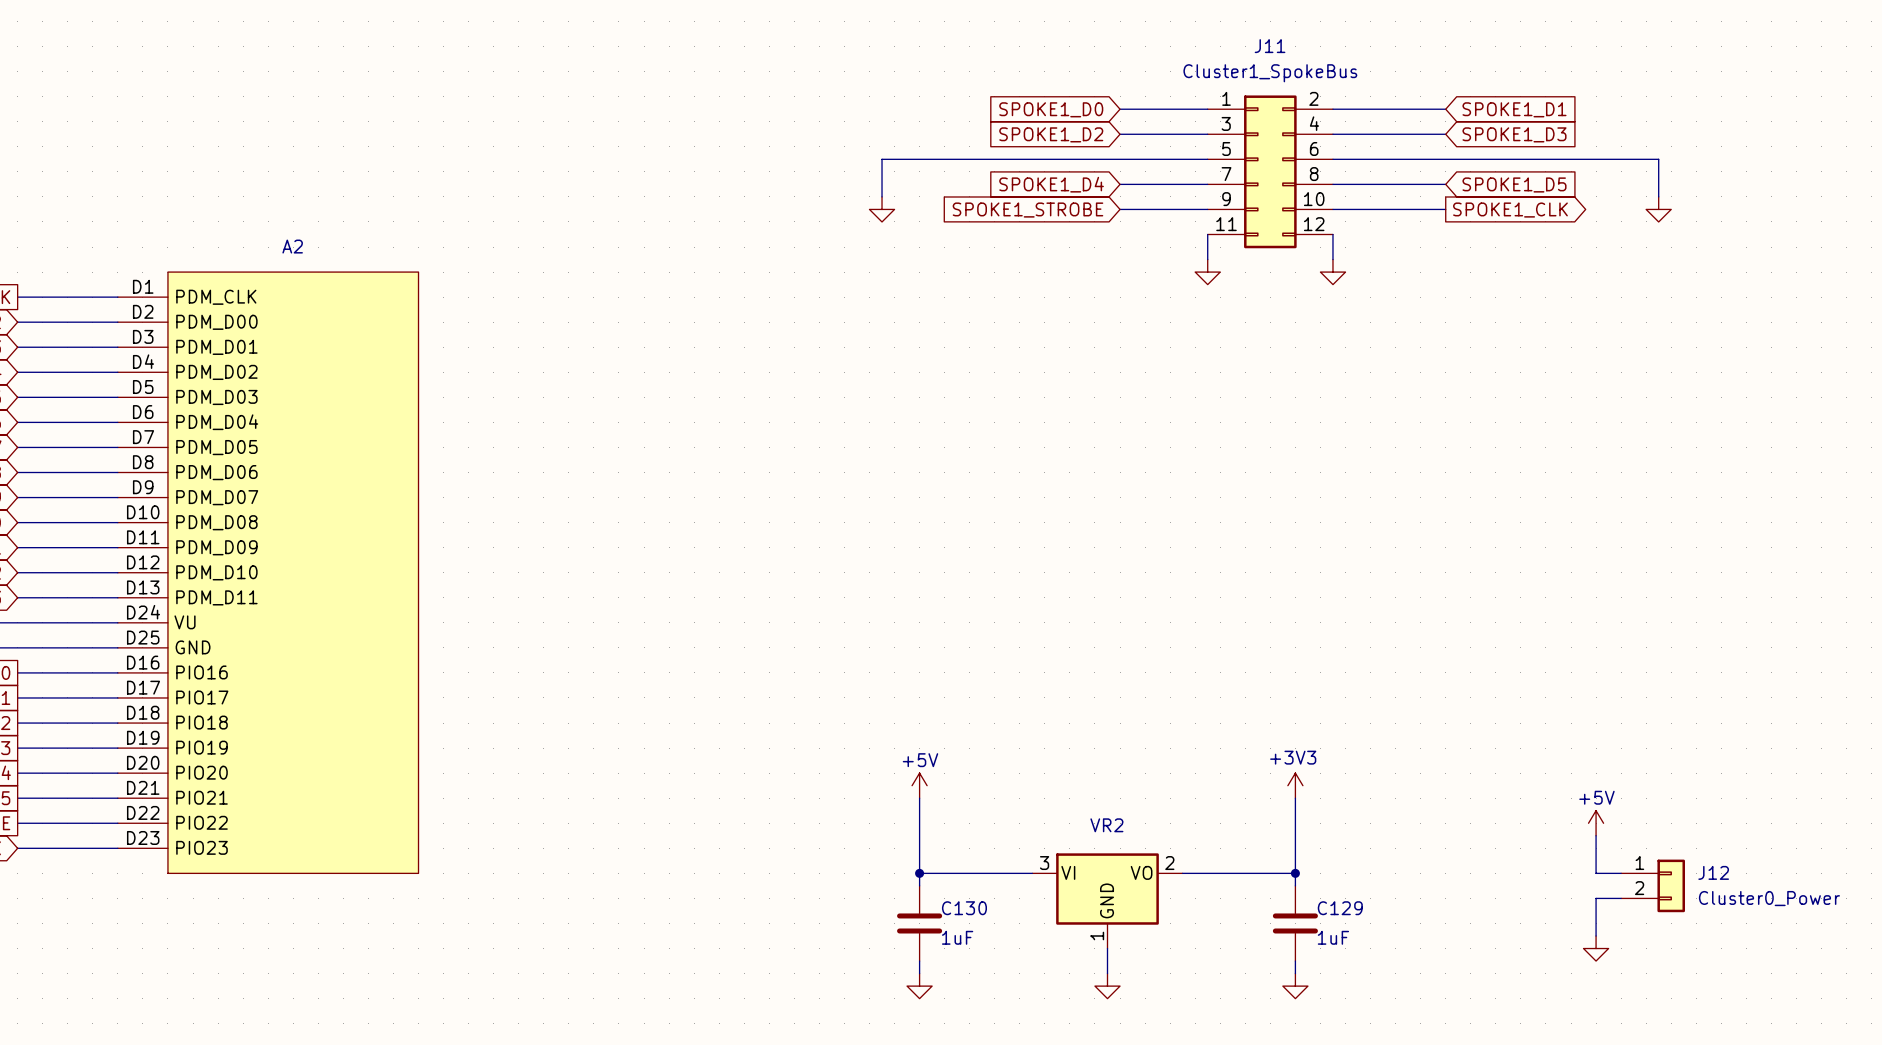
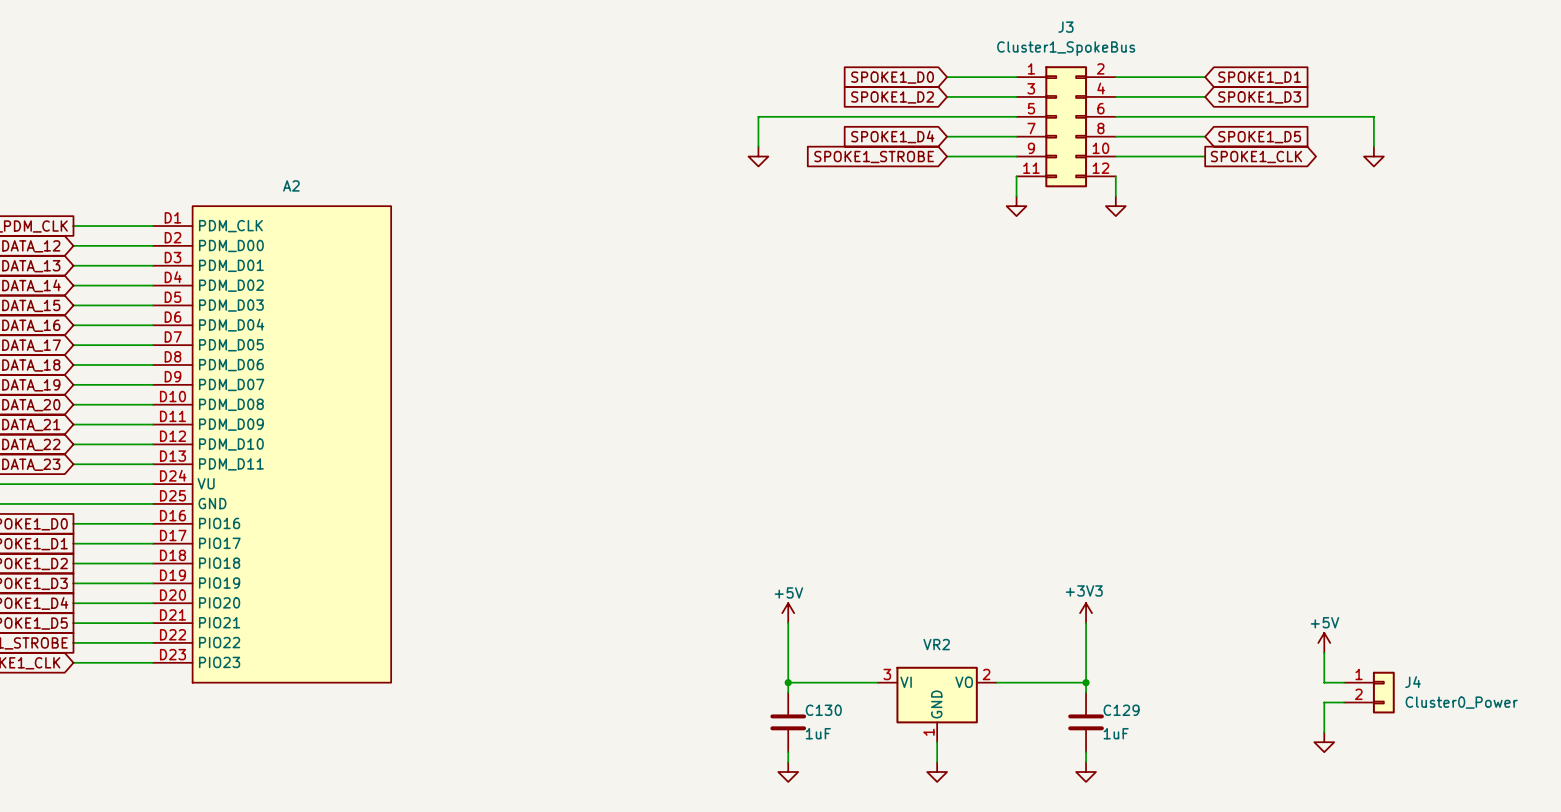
J11 name: J11 (1270, 46) -> J3 (1065, 27)
J12 name: J12 (1713, 872) -> J4 (1412, 682)

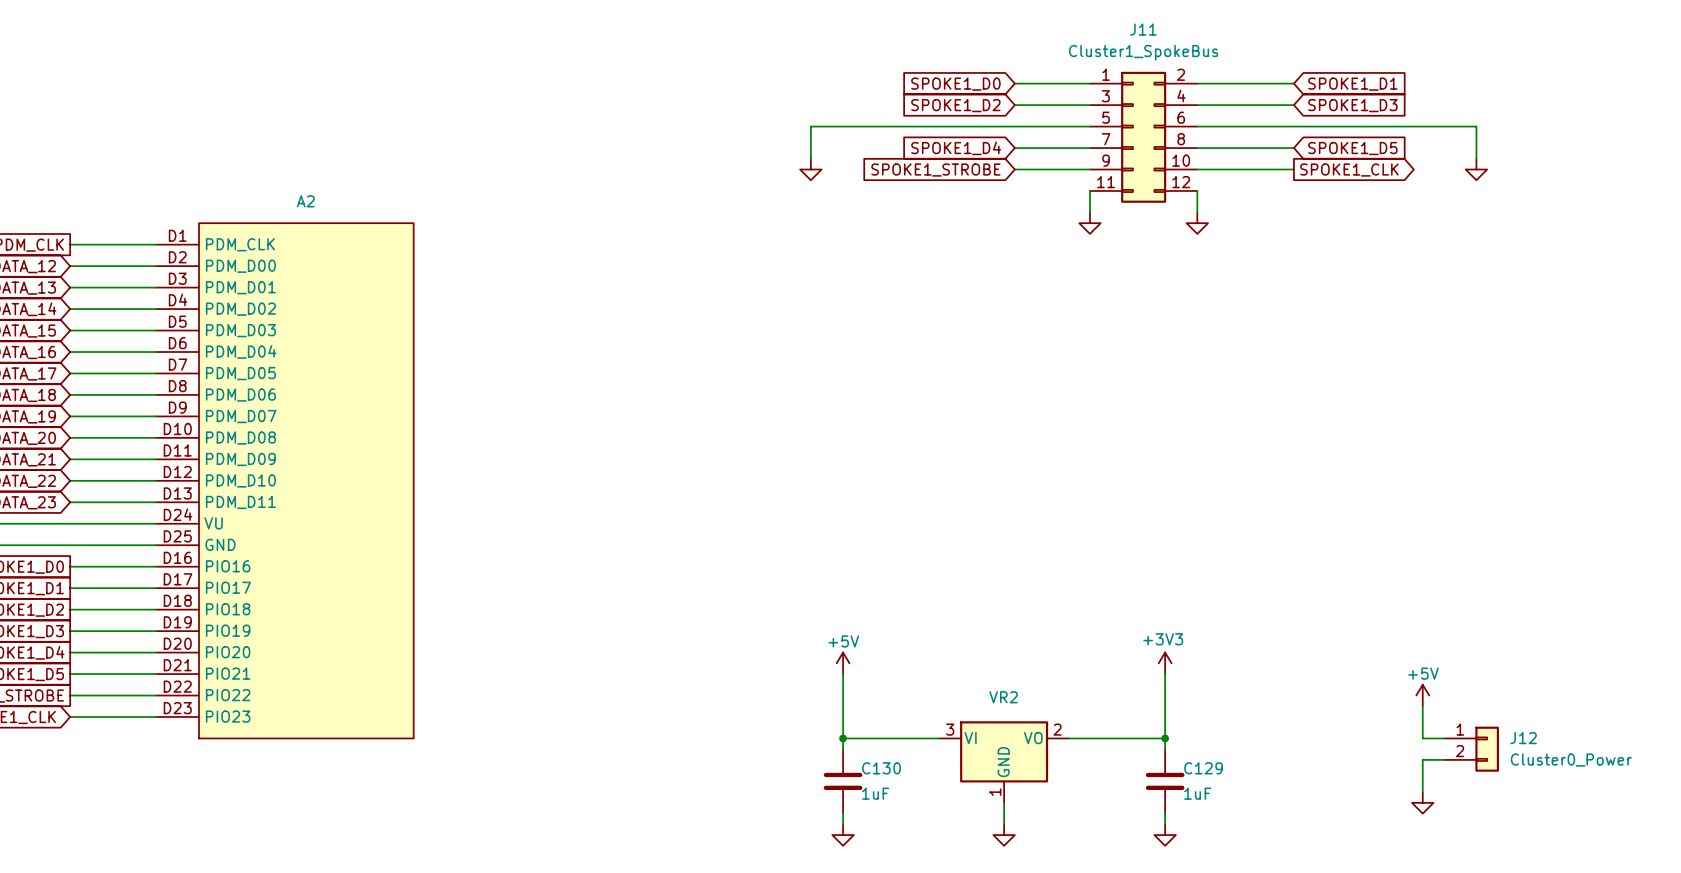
J3 name: J3 (1065, 27) -> J11 (1143, 29)
J4 name: J4 (1412, 682) -> J12 (1523, 738)

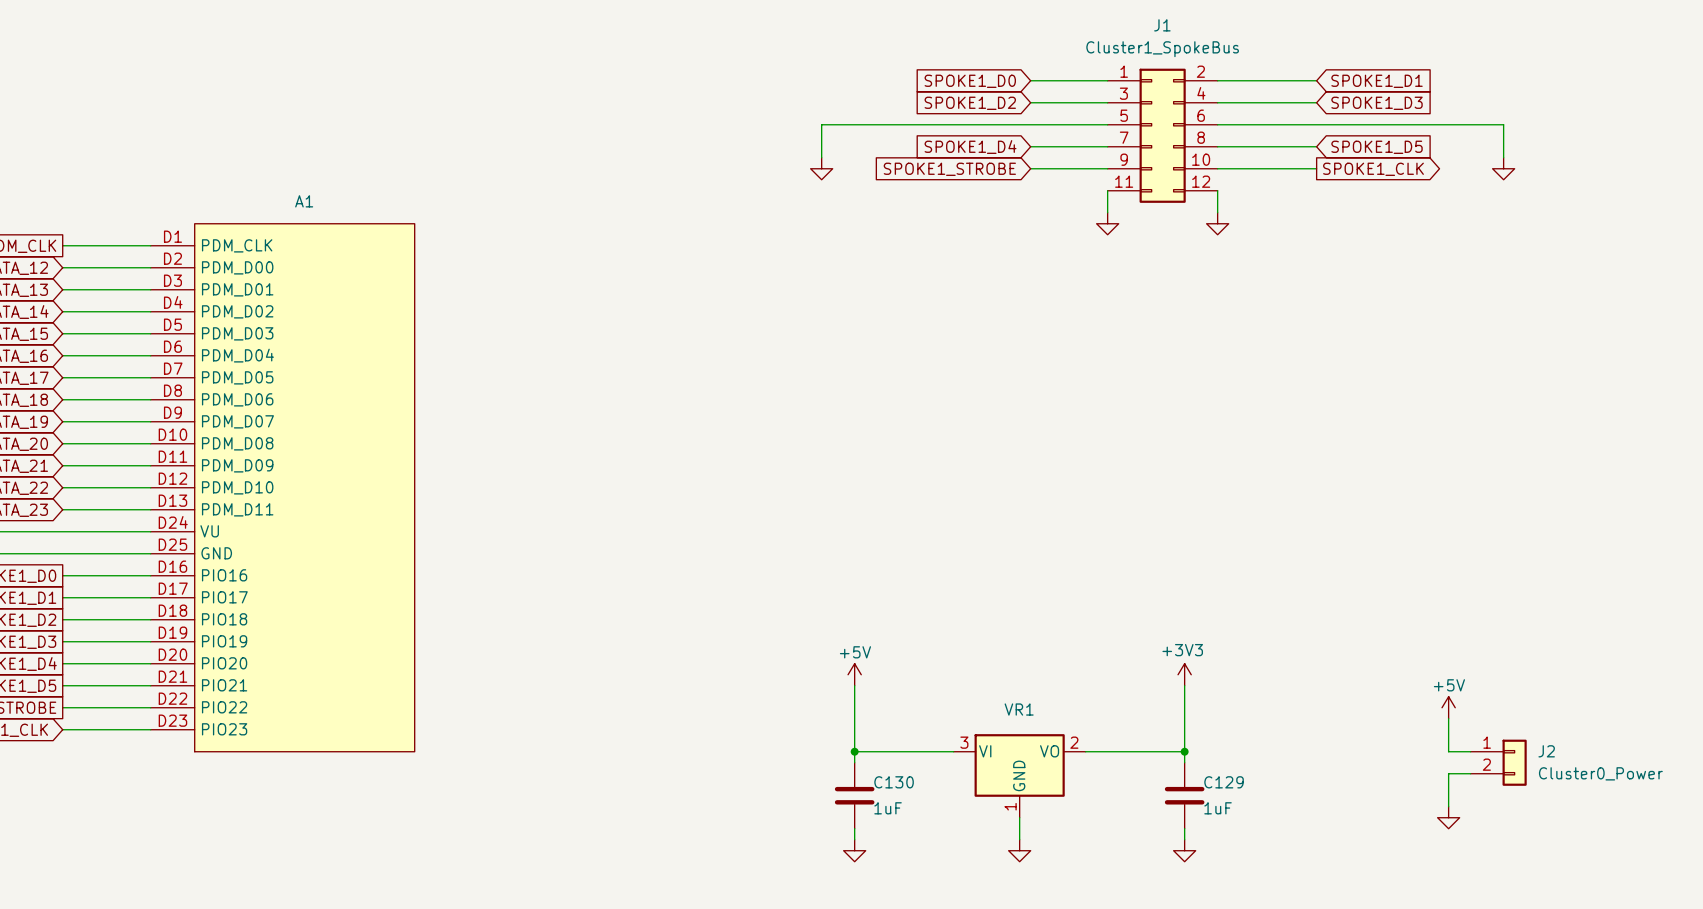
J11 name: J11 (1143, 29) -> J1 (1162, 25)
A2 name: A2 (305, 201) -> A1 (304, 201)
VR2 name: VR2 (1003, 697) -> VR1 (1019, 709)
J12 name: J12 (1523, 738) -> J2 (1546, 751)

